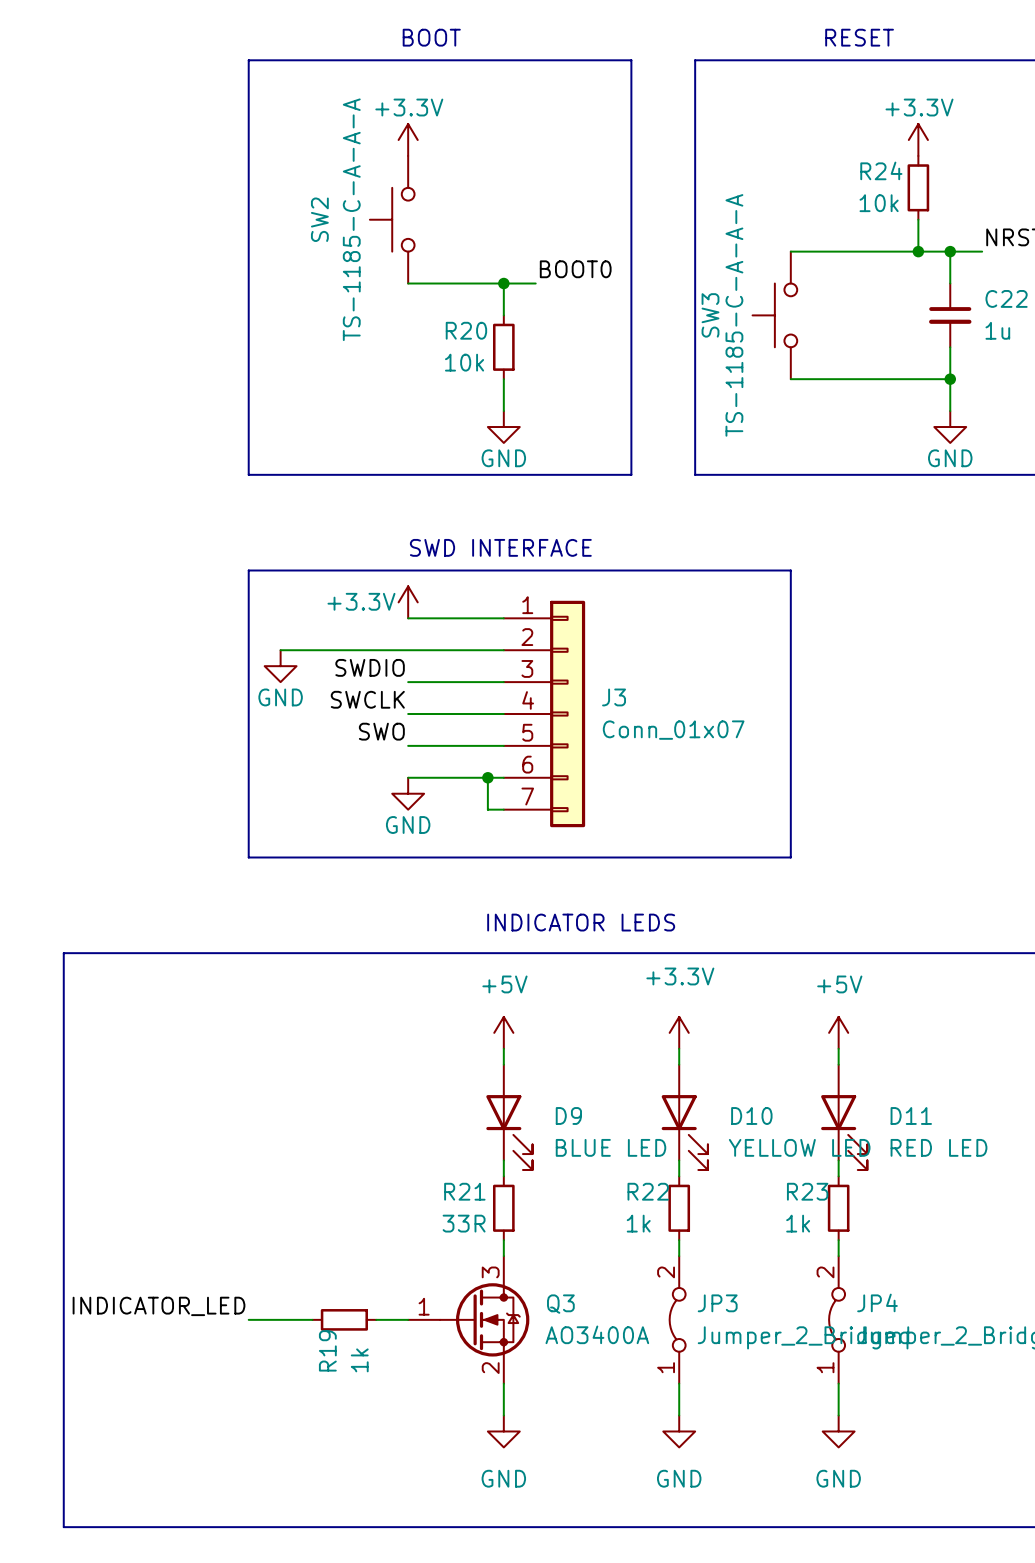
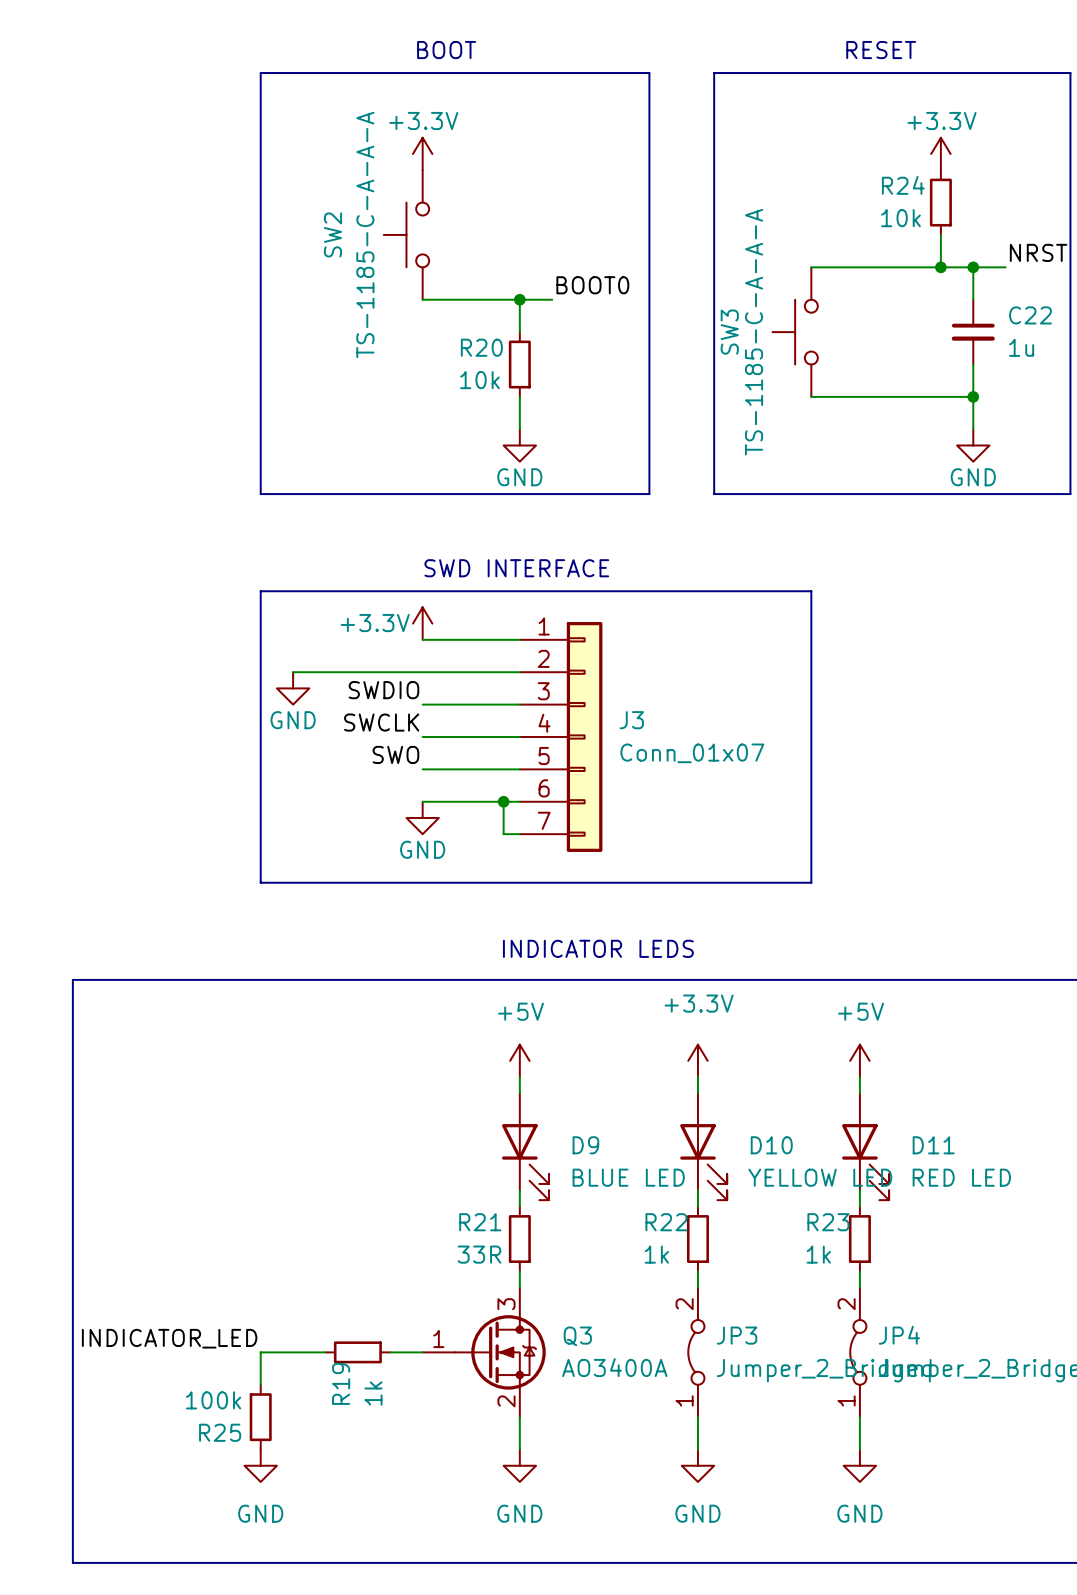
wire: none -> (260, 1352) (260, 1384)
R25: none -> 100k (260, 1417)
power symbol: none -> GND (260, 1465)

